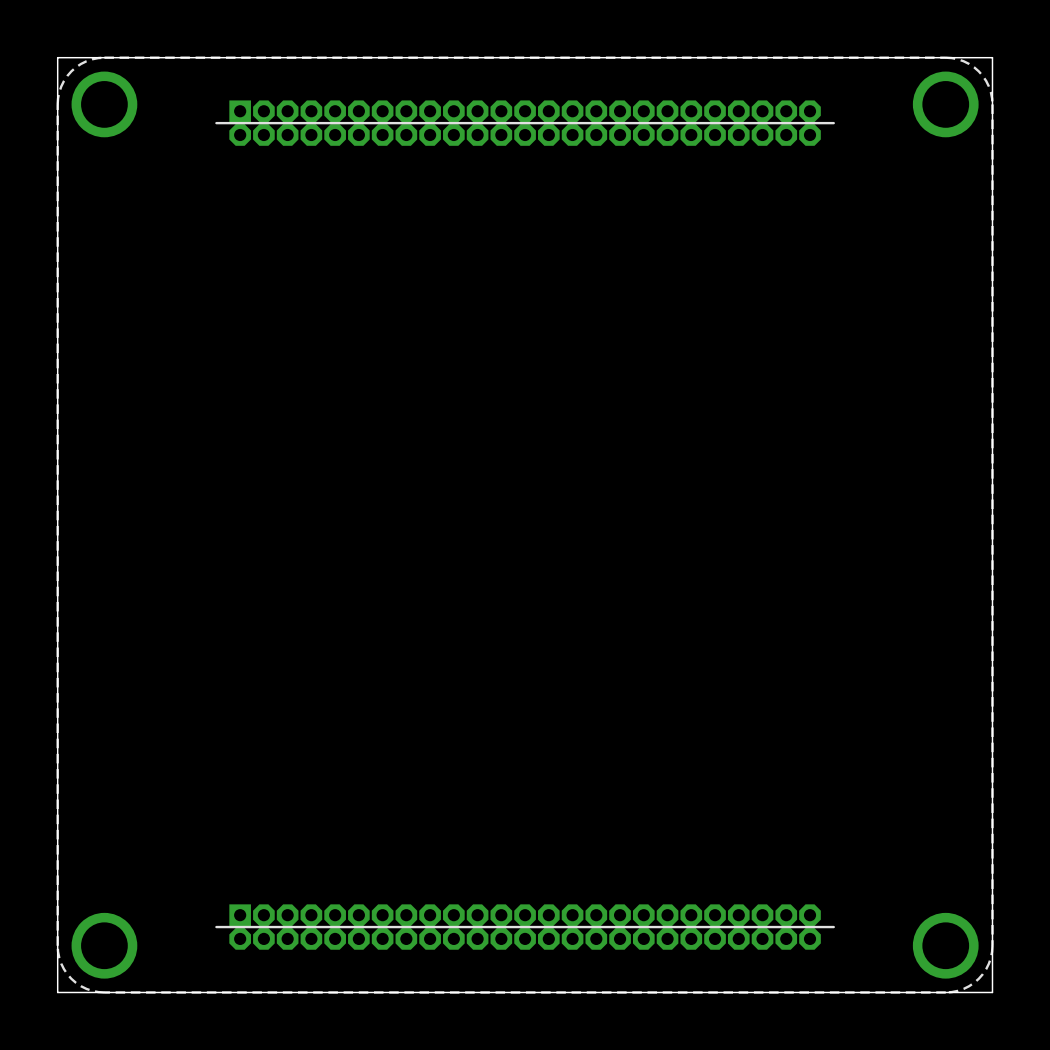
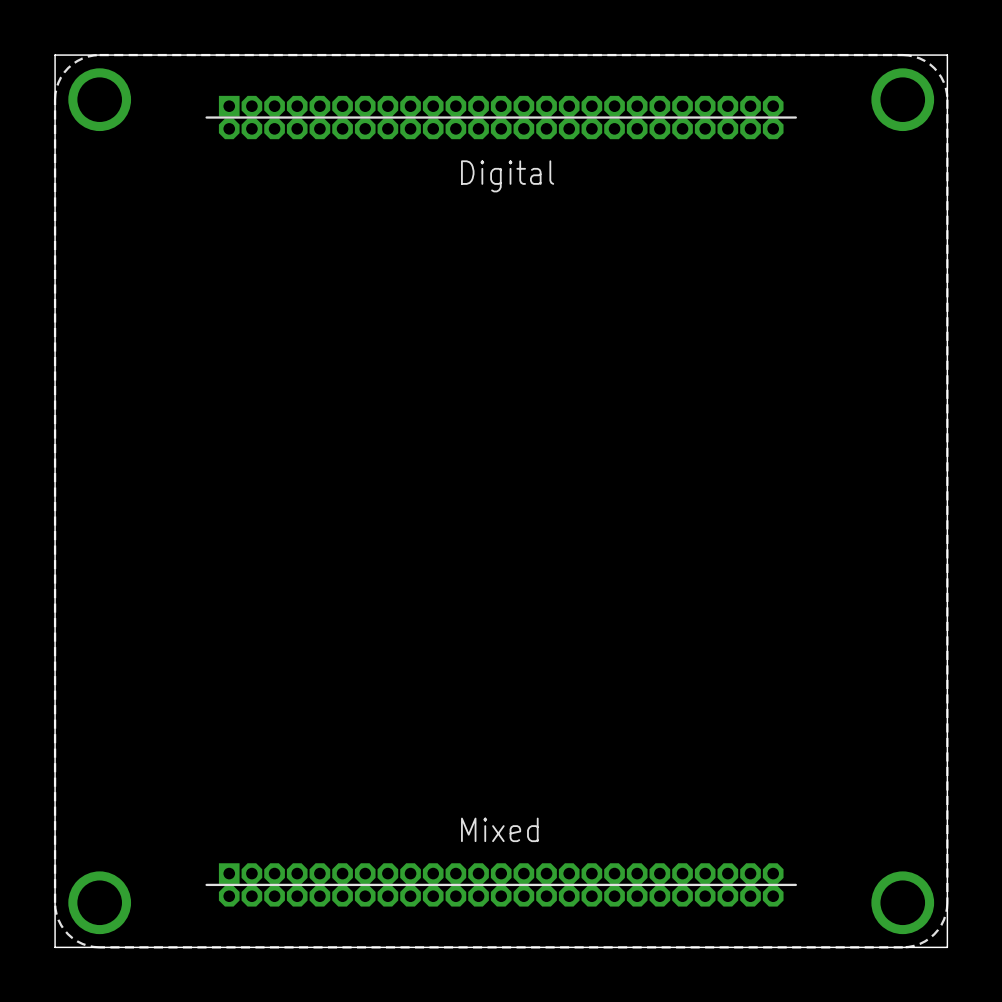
part text: none -> Digital (507, 176)
part text: none -> Mixed (499, 829)

